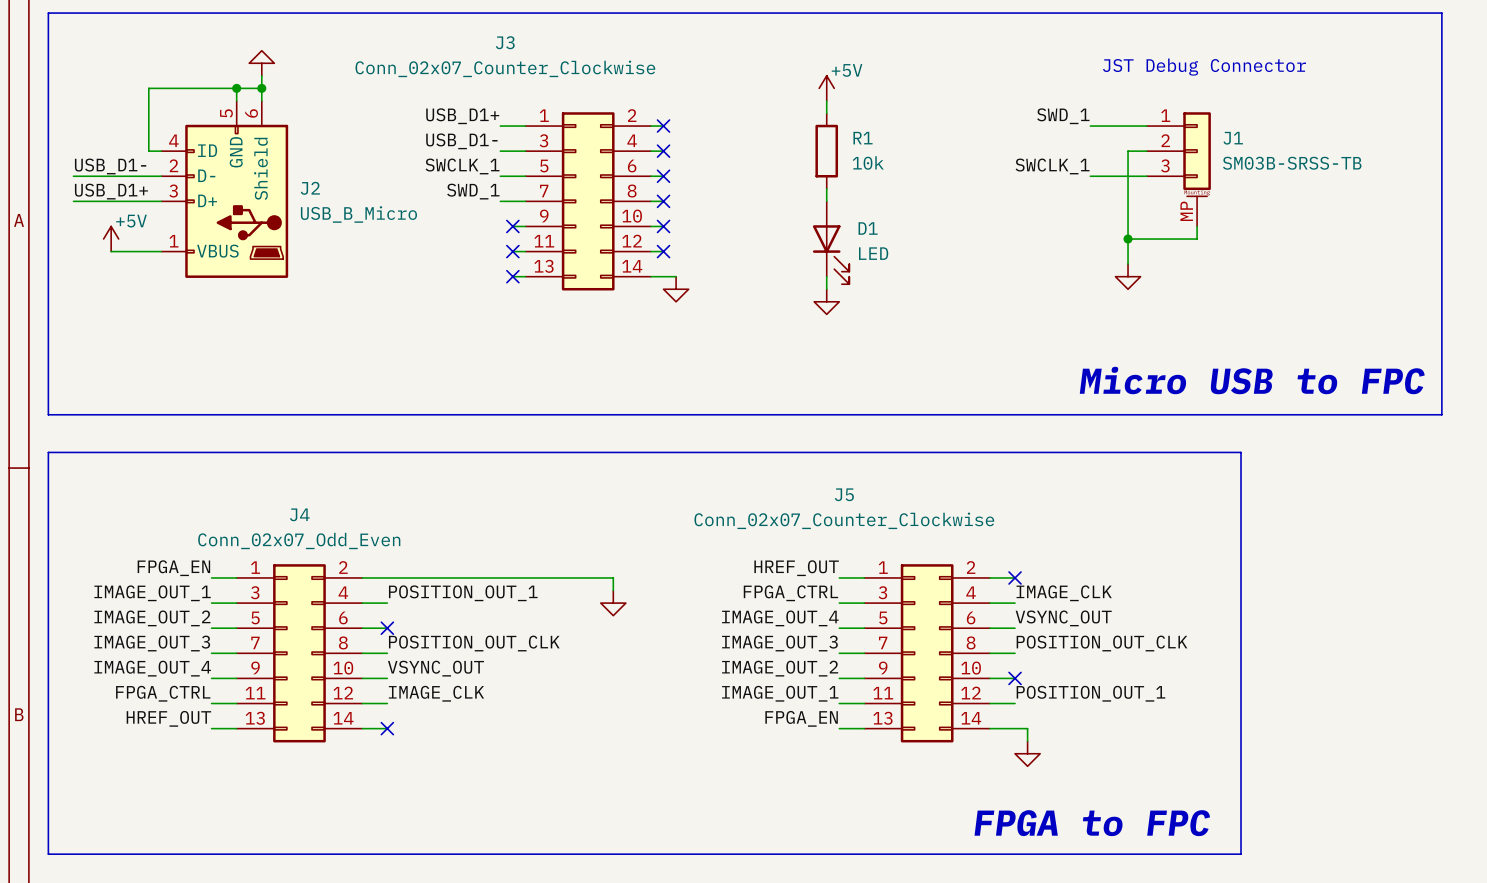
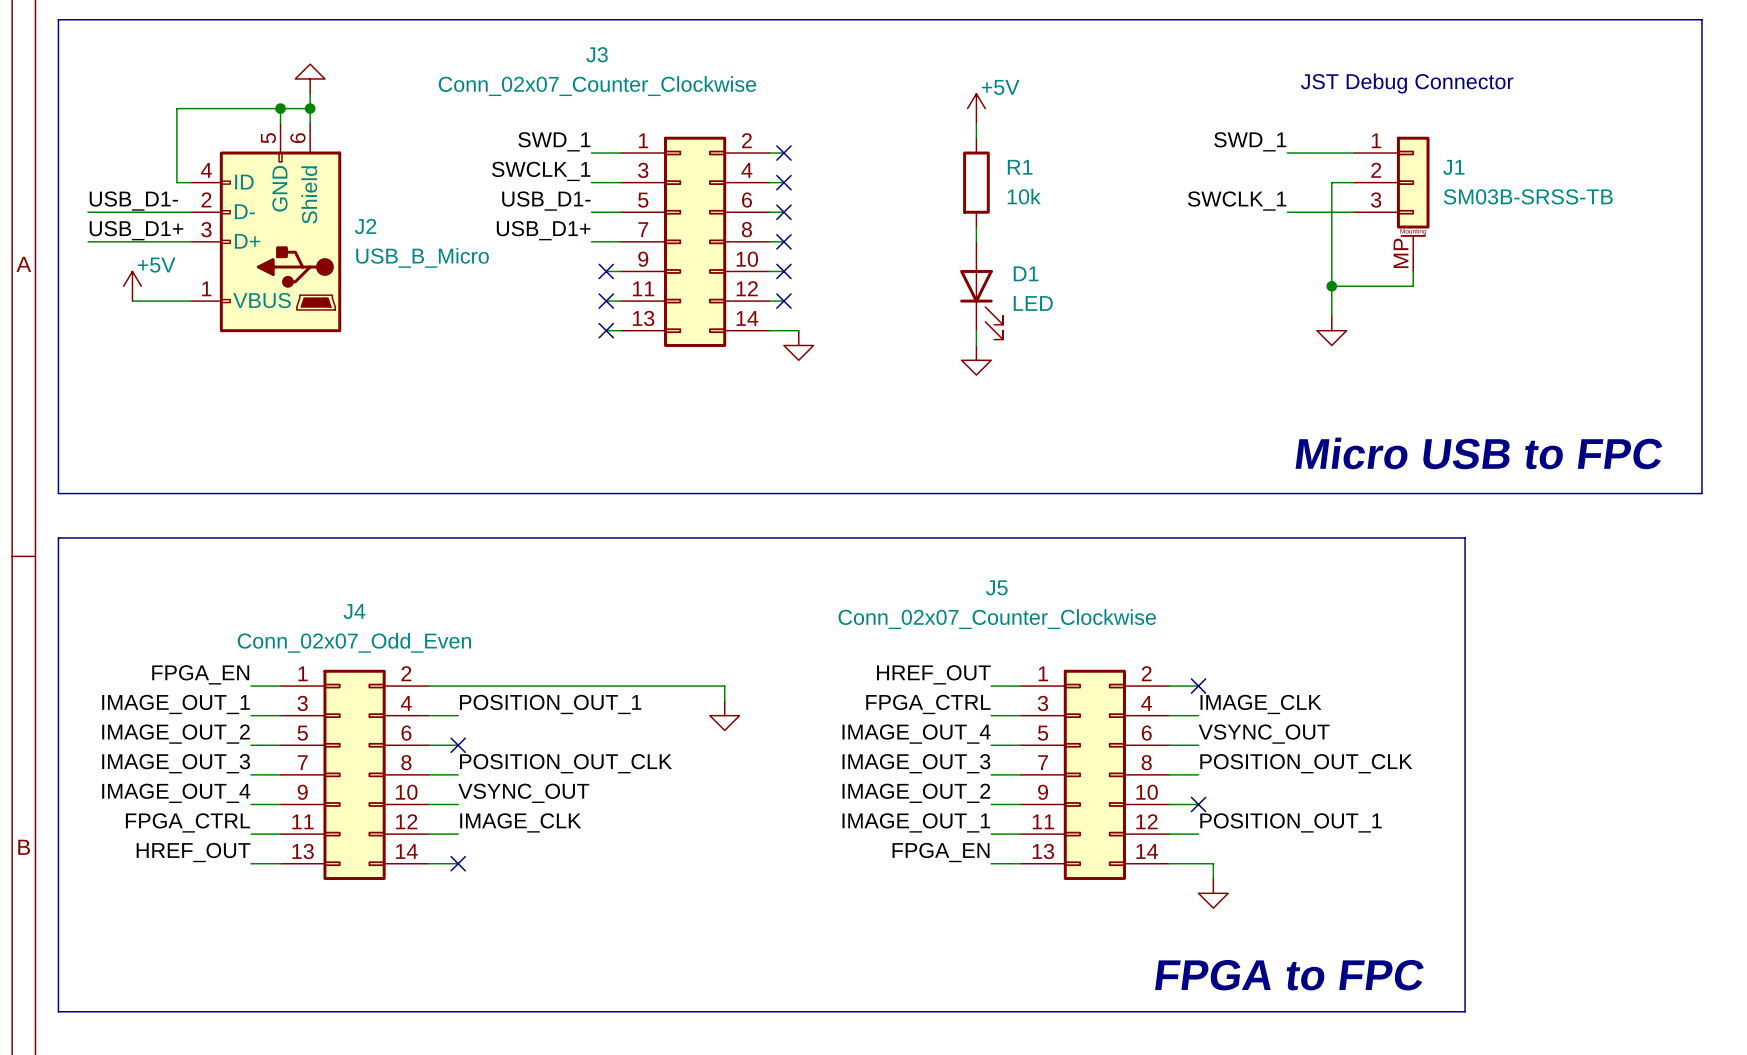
label: USB_D1+ (462, 116) -> SWD_1 (554, 141)
label: USB_D1- (461, 141) -> SWCLK_1 (541, 171)
label: SWCLK_1 (462, 166) -> USB_D1- (546, 201)
label: SWD_1 (473, 191) -> USB_D1+ (543, 230)

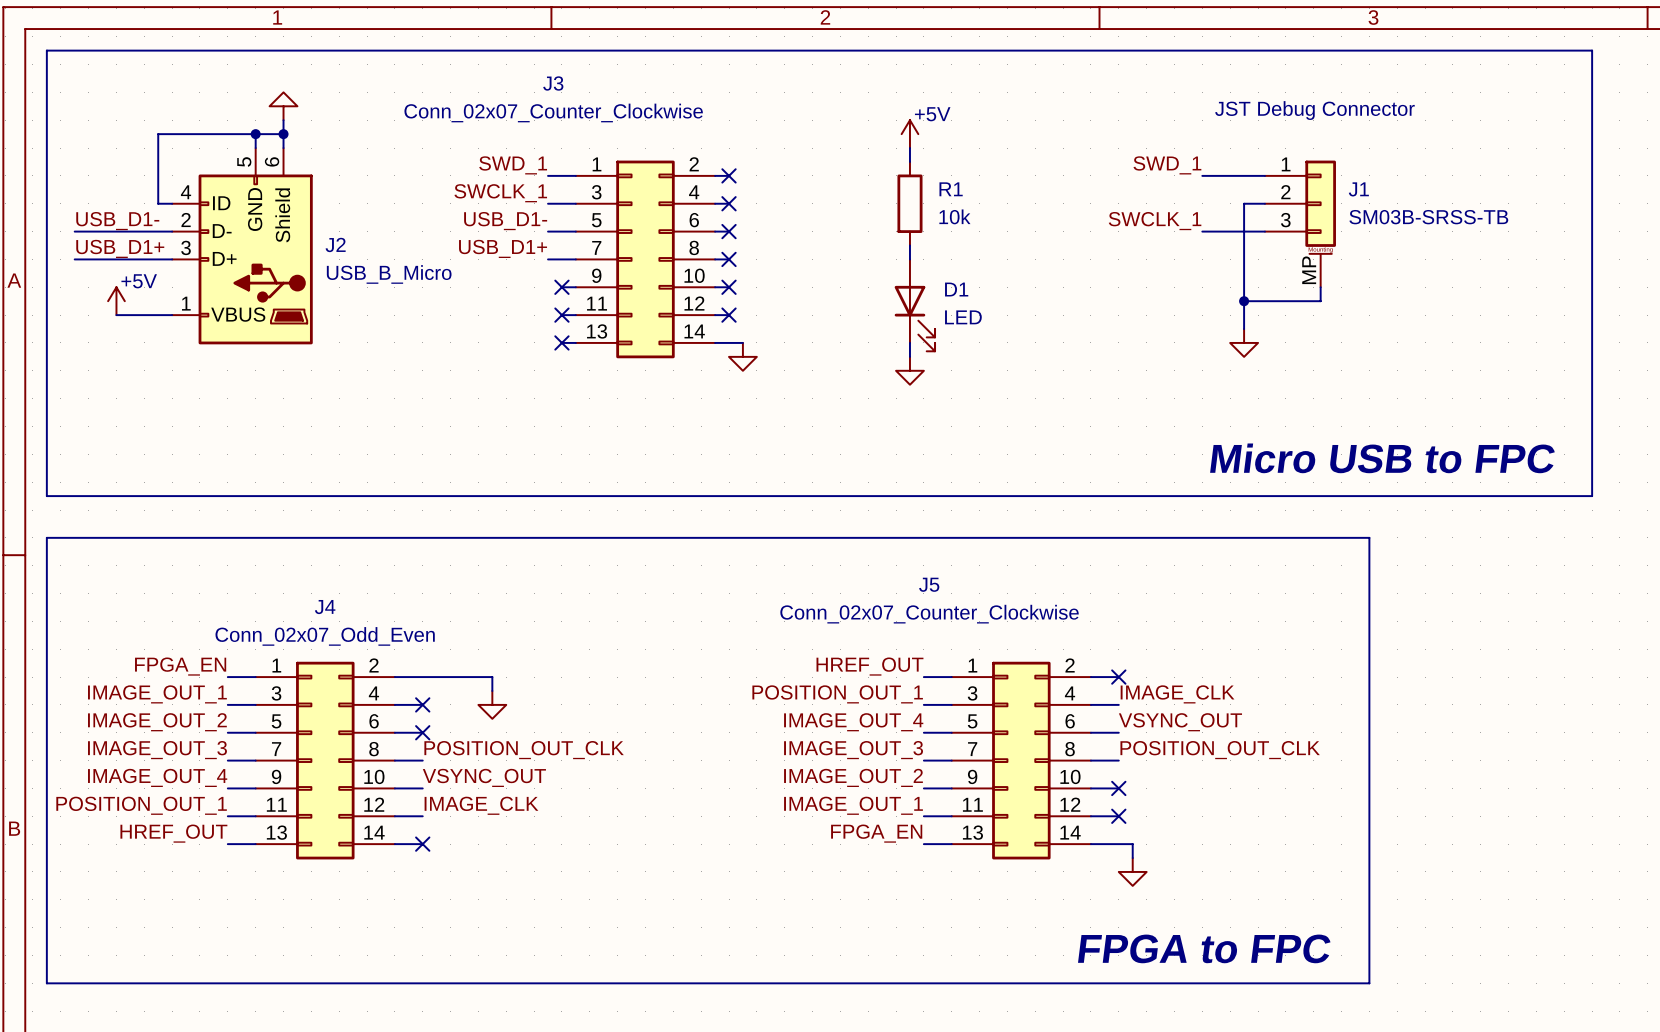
wire: (532, 686) (724, 686) (724, 700) -> (492, 677) (492, 690)
label: POSITION_OUT_1 (550, 704) -> none
label: FPGA_CTRL (928, 704) -> POSITION_OUT_1 (837, 694)
no-connect mark: none -> (422, 704)
power symbol position: (724, 715) -> (492, 704)
label: FPGA_CTRL (188, 822) -> POSITION_OUT_1 (141, 805)
label: POSITION_OUT_1 (1290, 822) -> none
no-connect mark: none -> (1118, 816)

